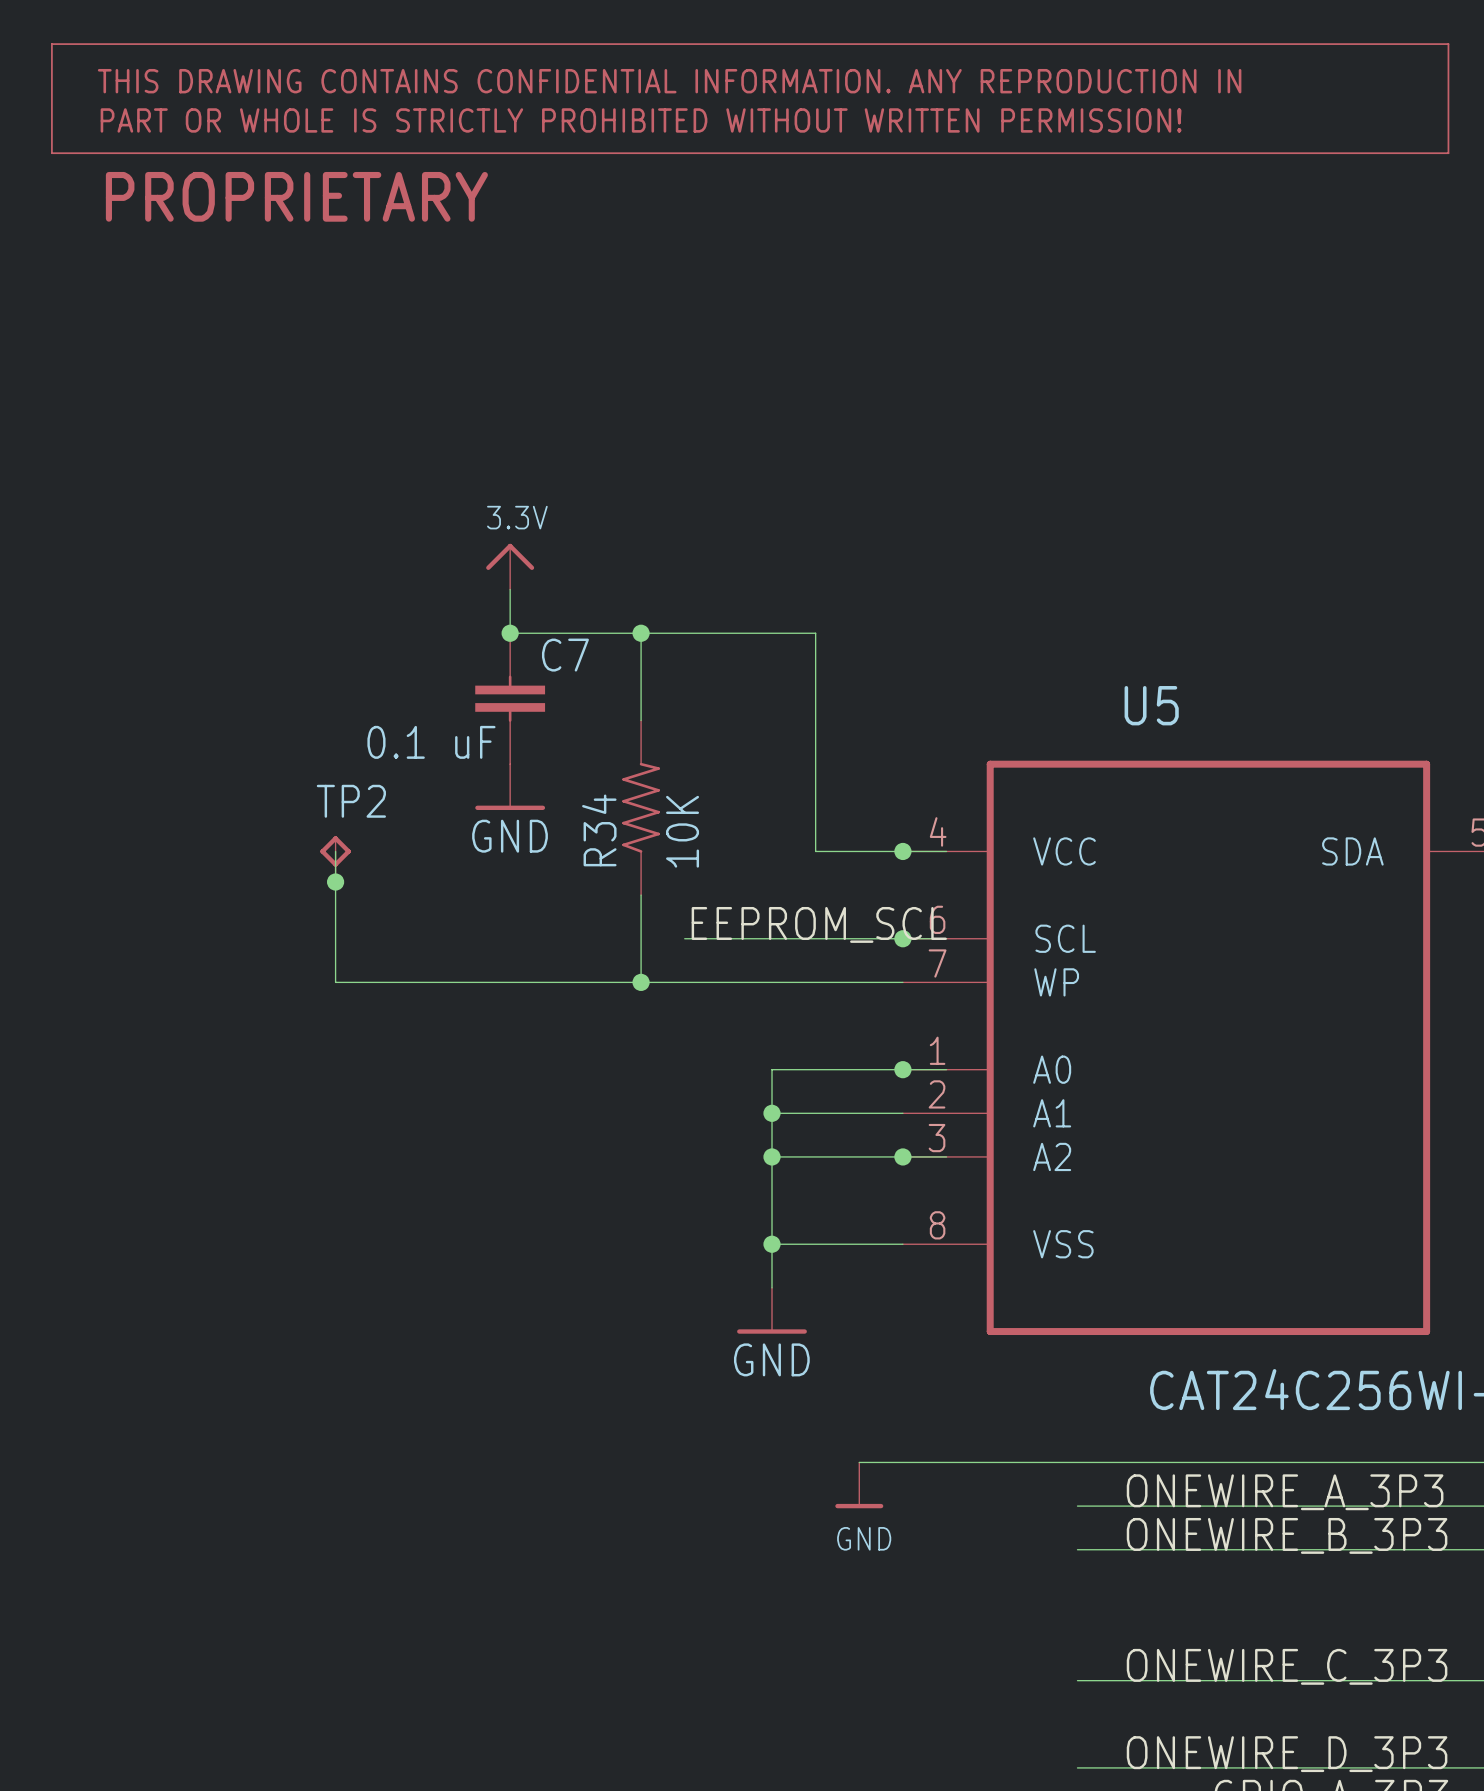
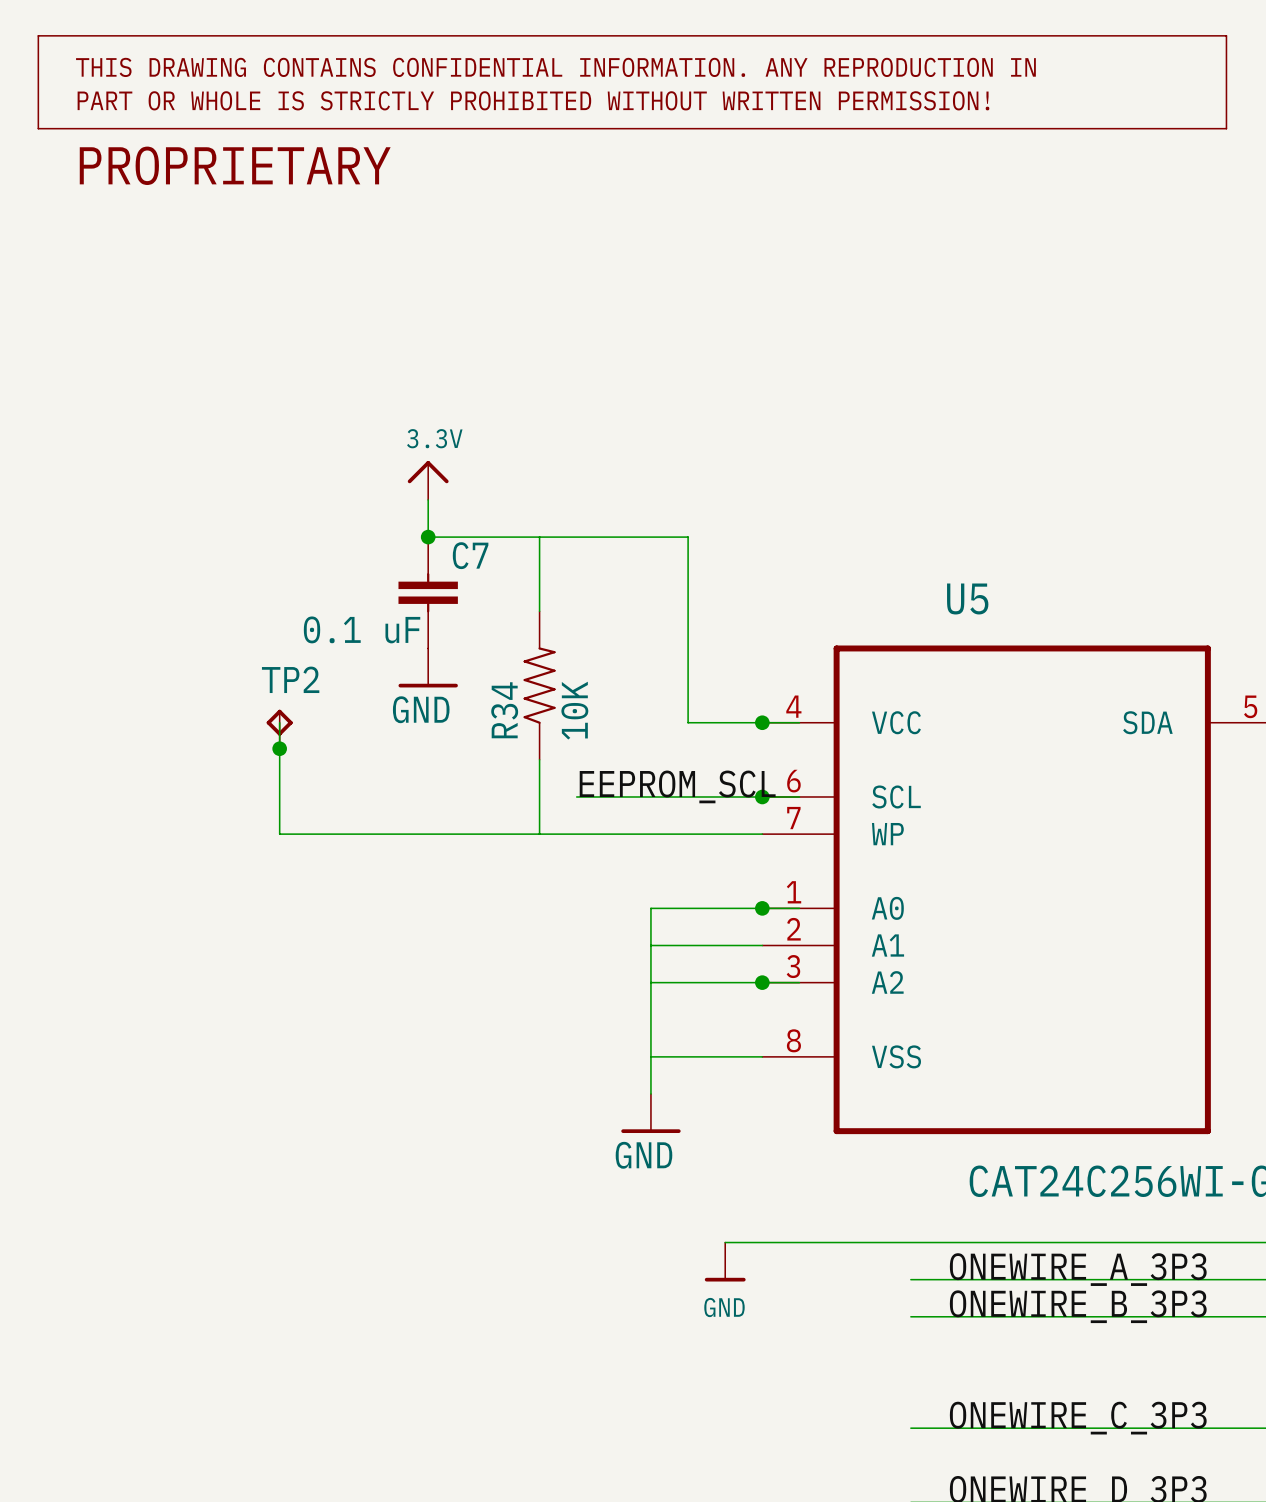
junction: (641, 633) -> none
junction: (641, 982) -> none
junction: (772, 1113) -> none
junction: (772, 1156) -> none
junction: (772, 1244) -> none

